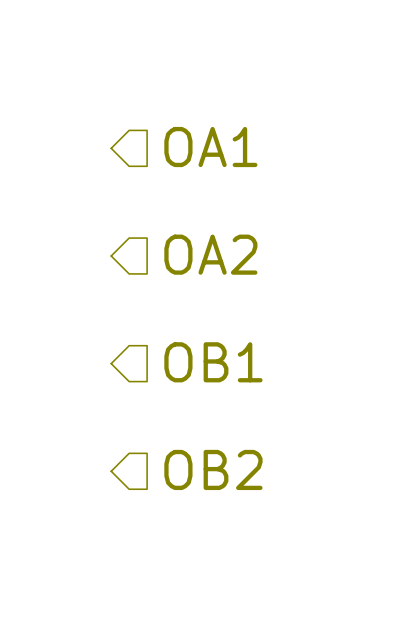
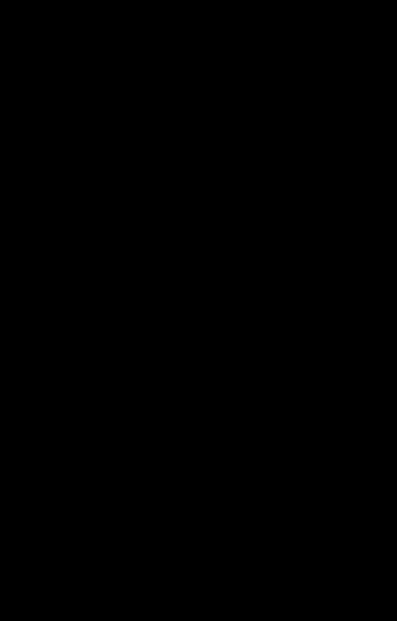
hierarchical label: OA1 (210, 147) -> none
hierarchical label: OA2 (210, 254) -> none
hierarchical label: OB1 (213, 362) -> none
hierarchical label: OB2 (213, 469) -> none

